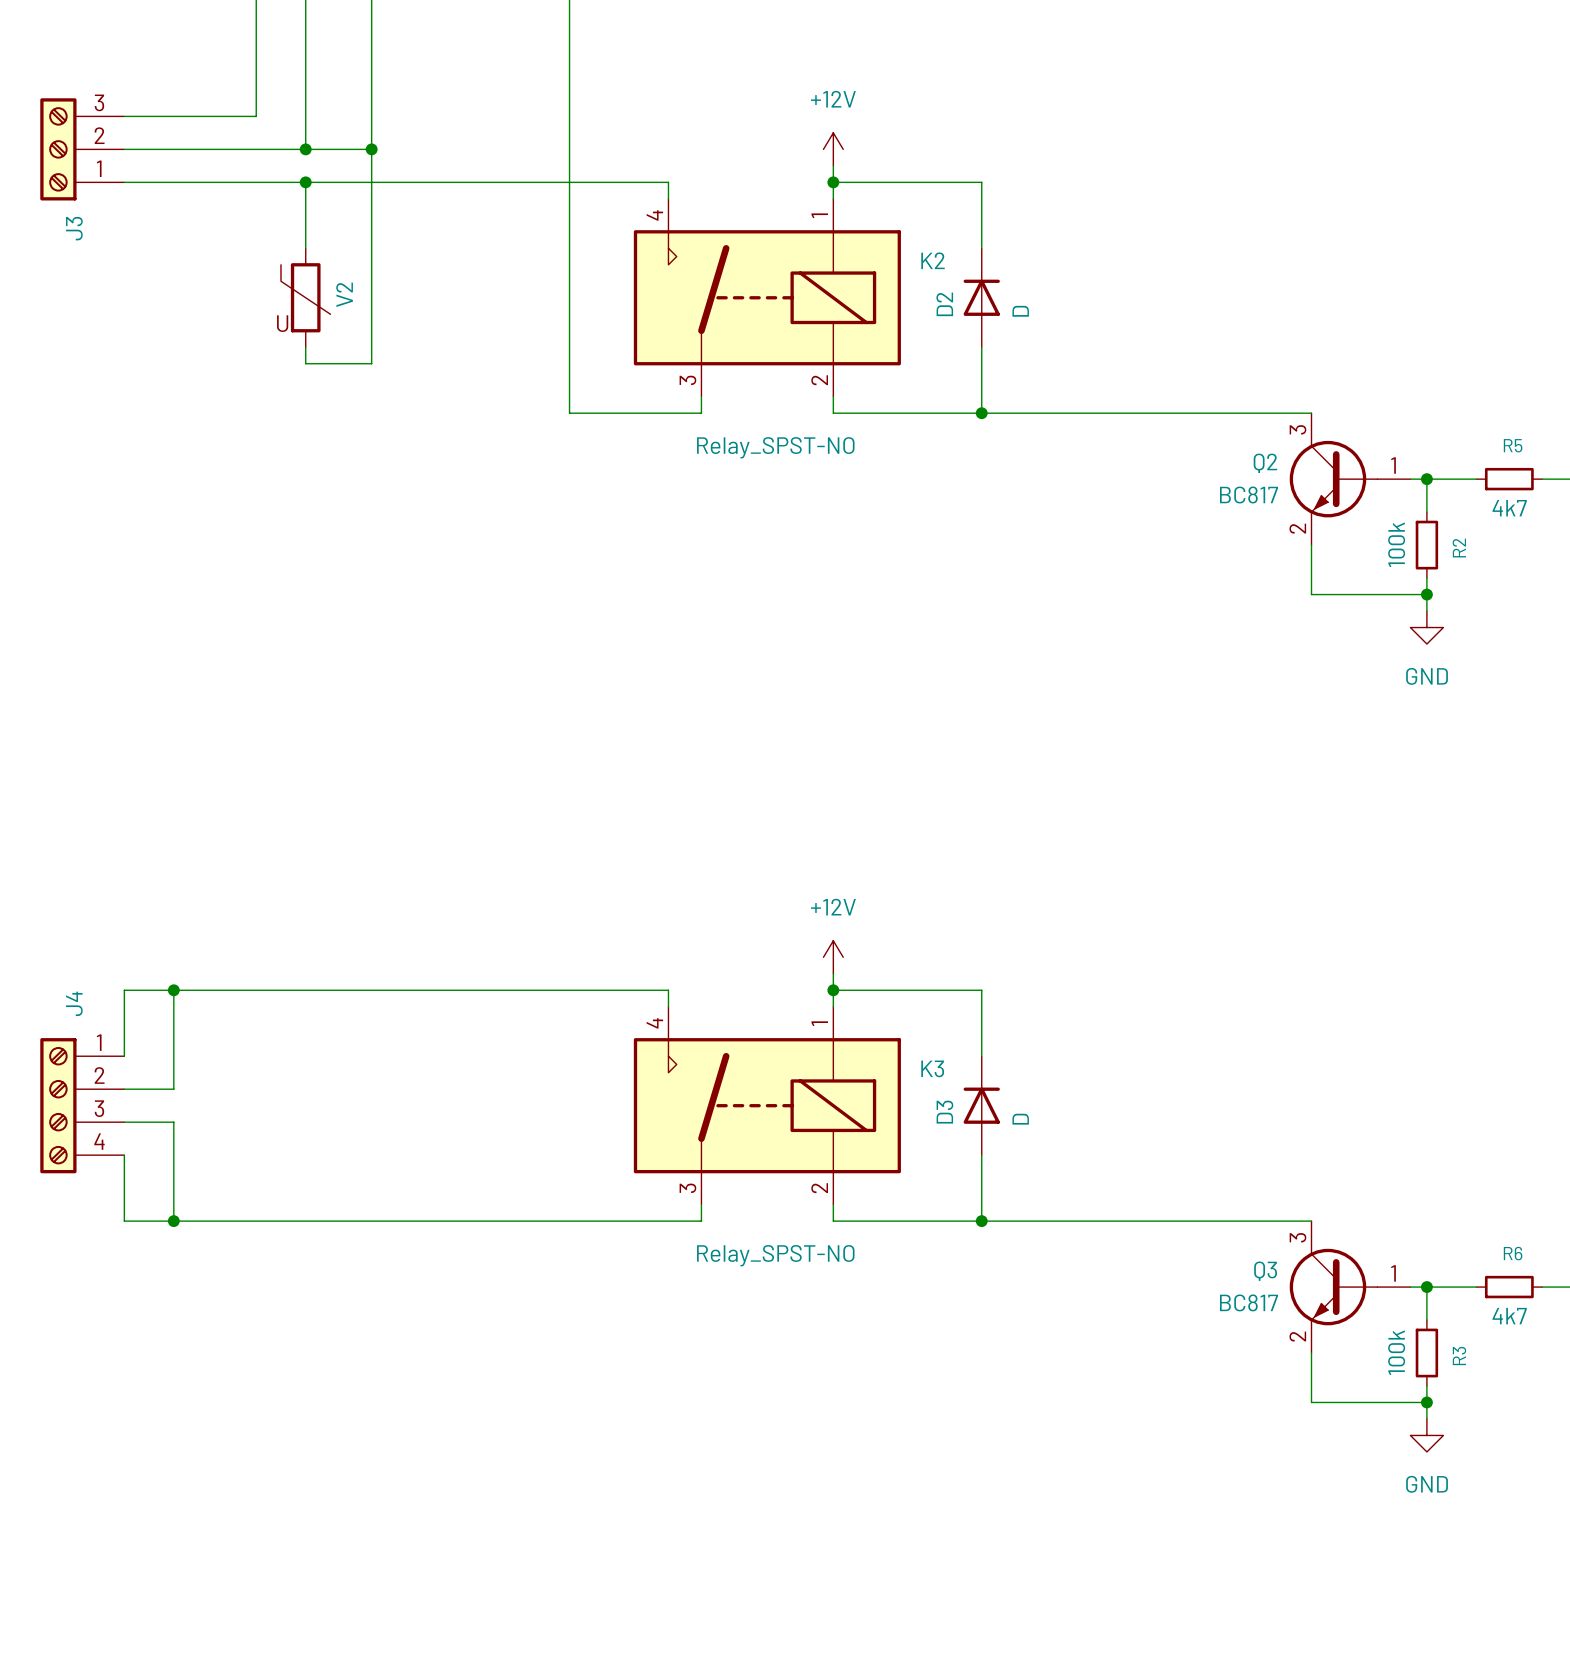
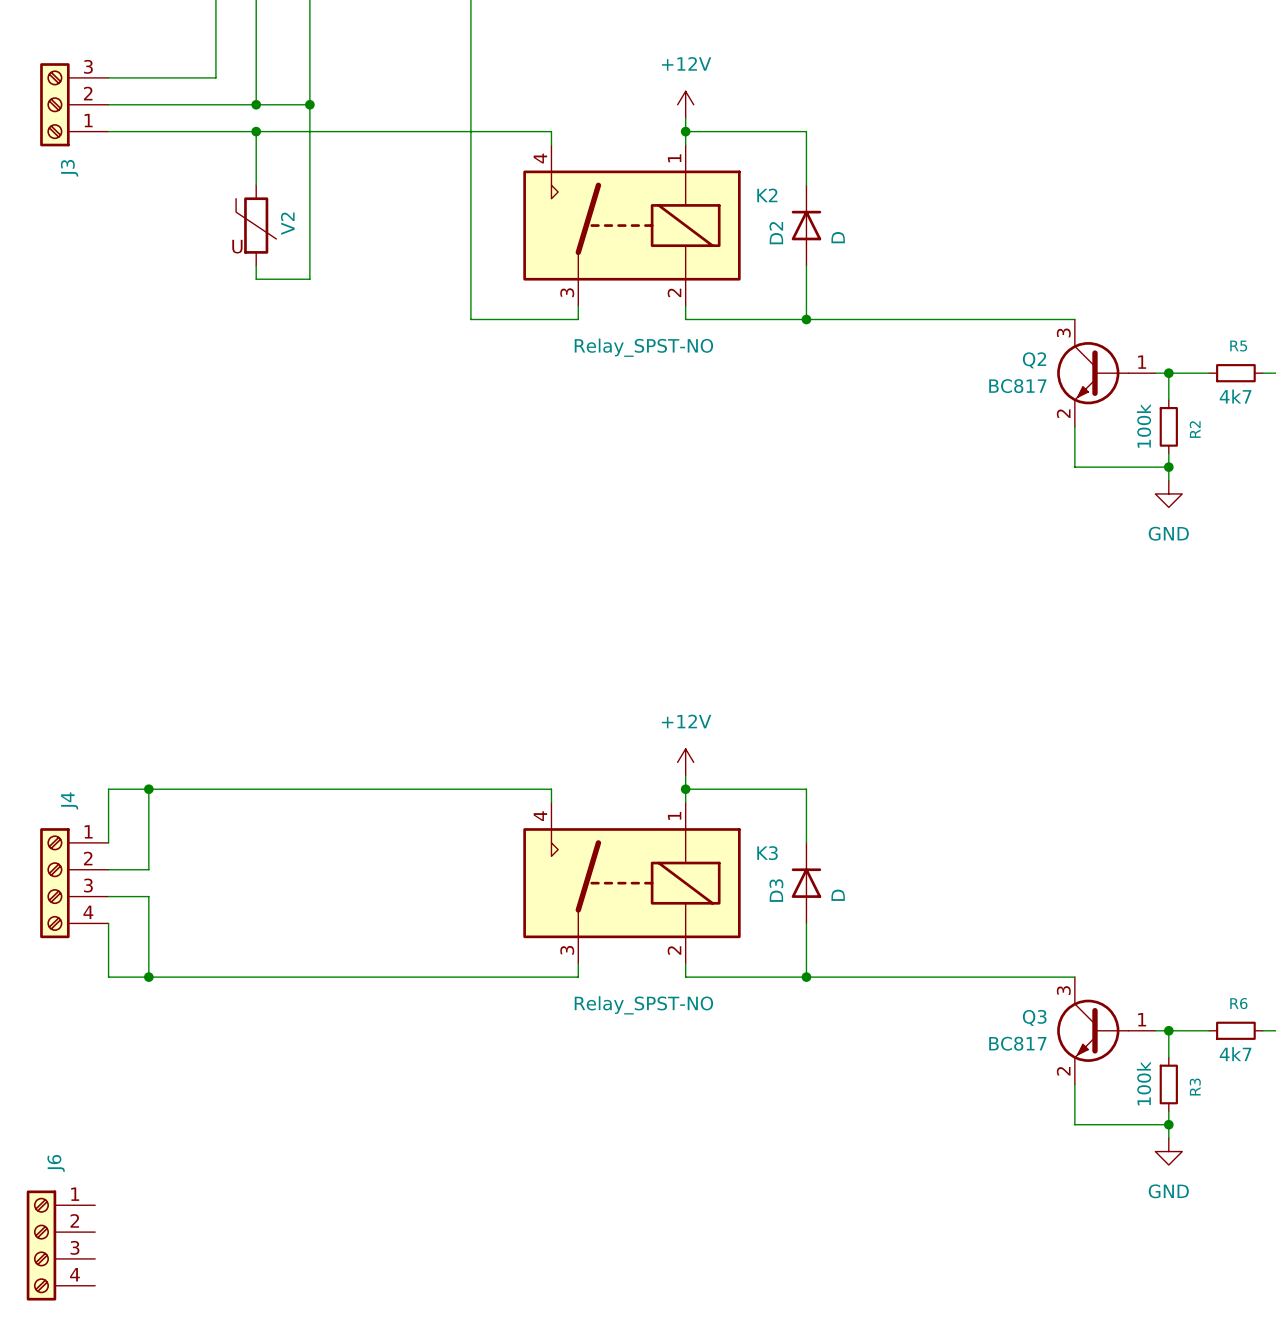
J6: none -> (60, 1245)

